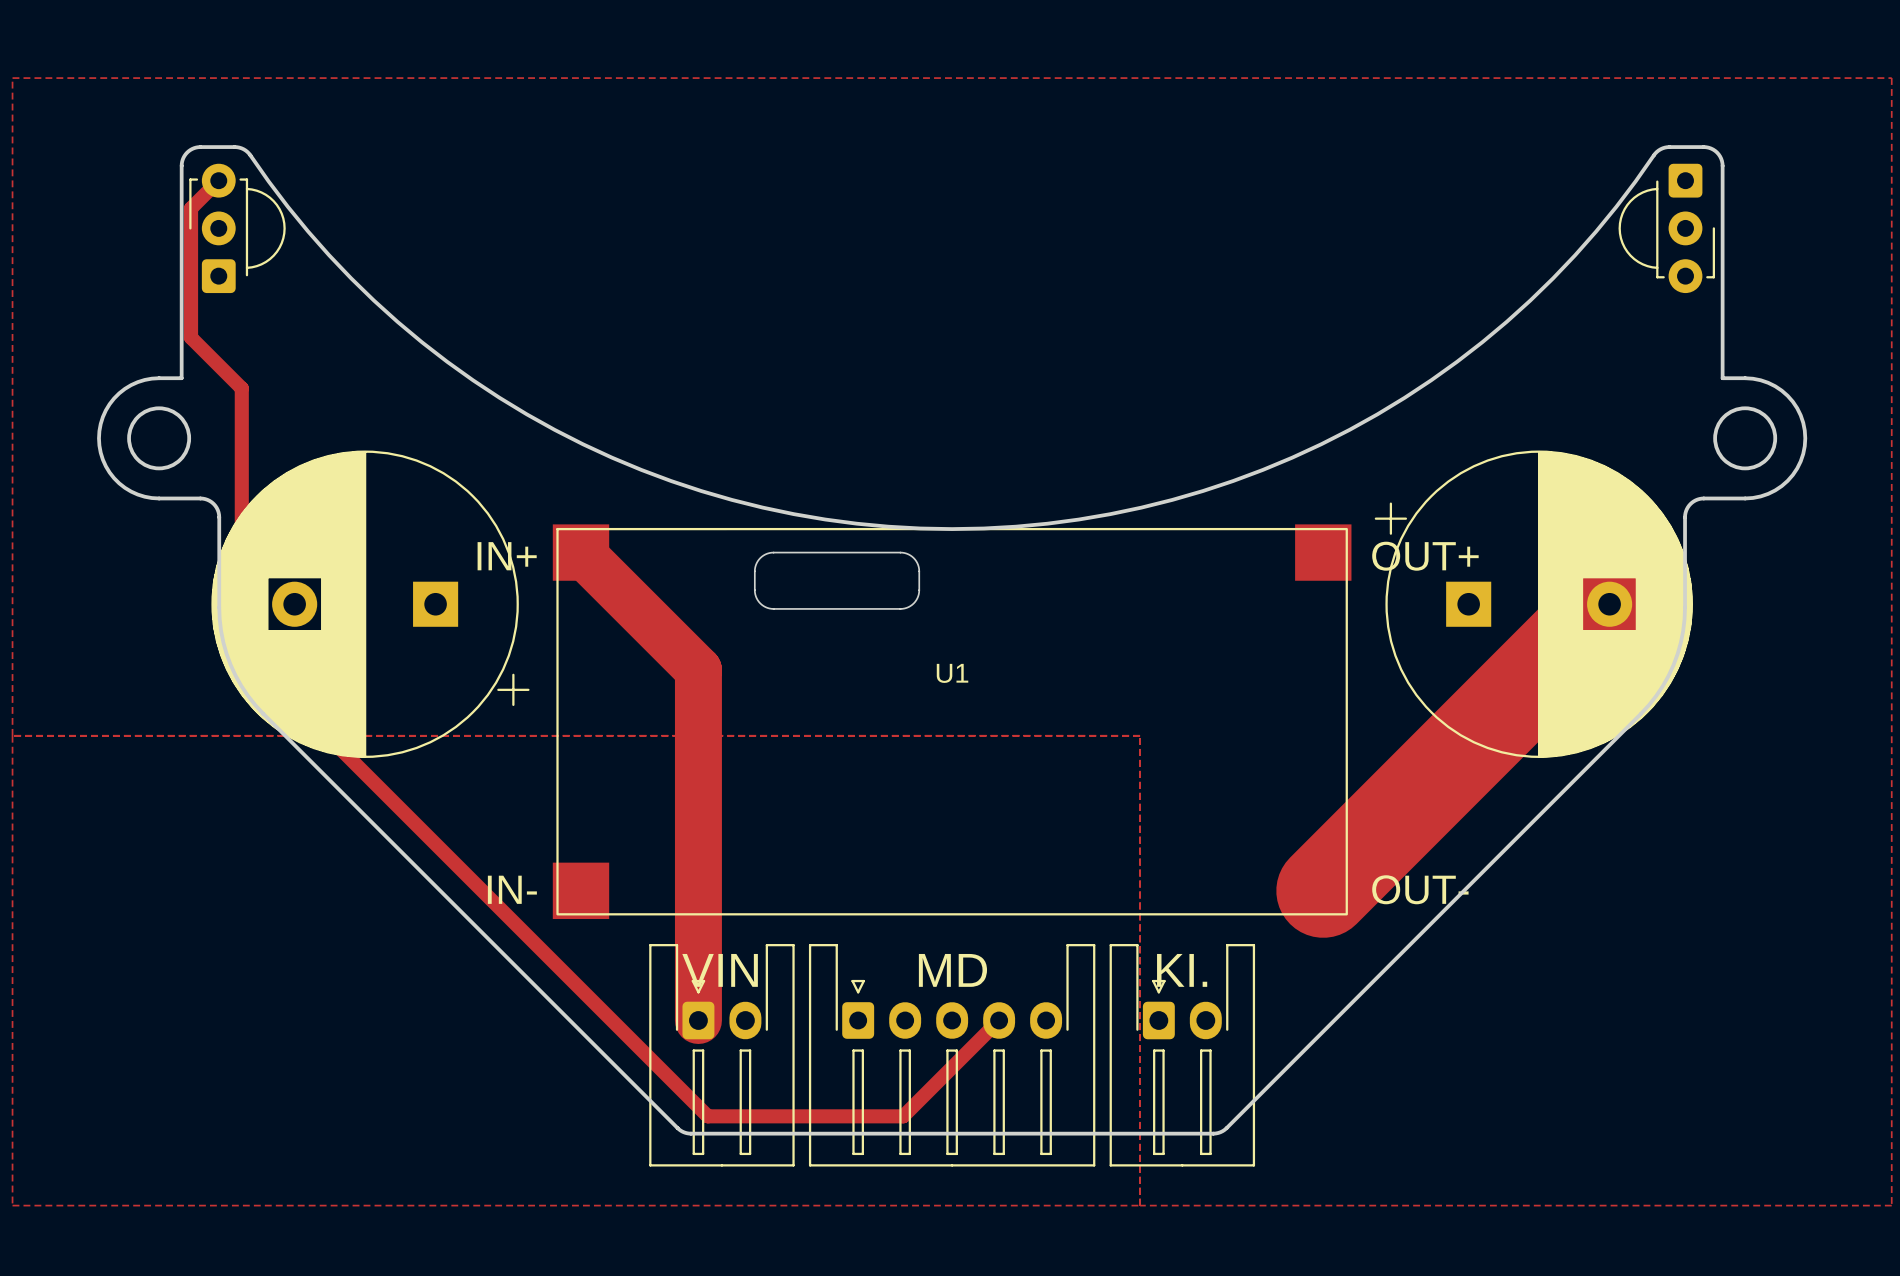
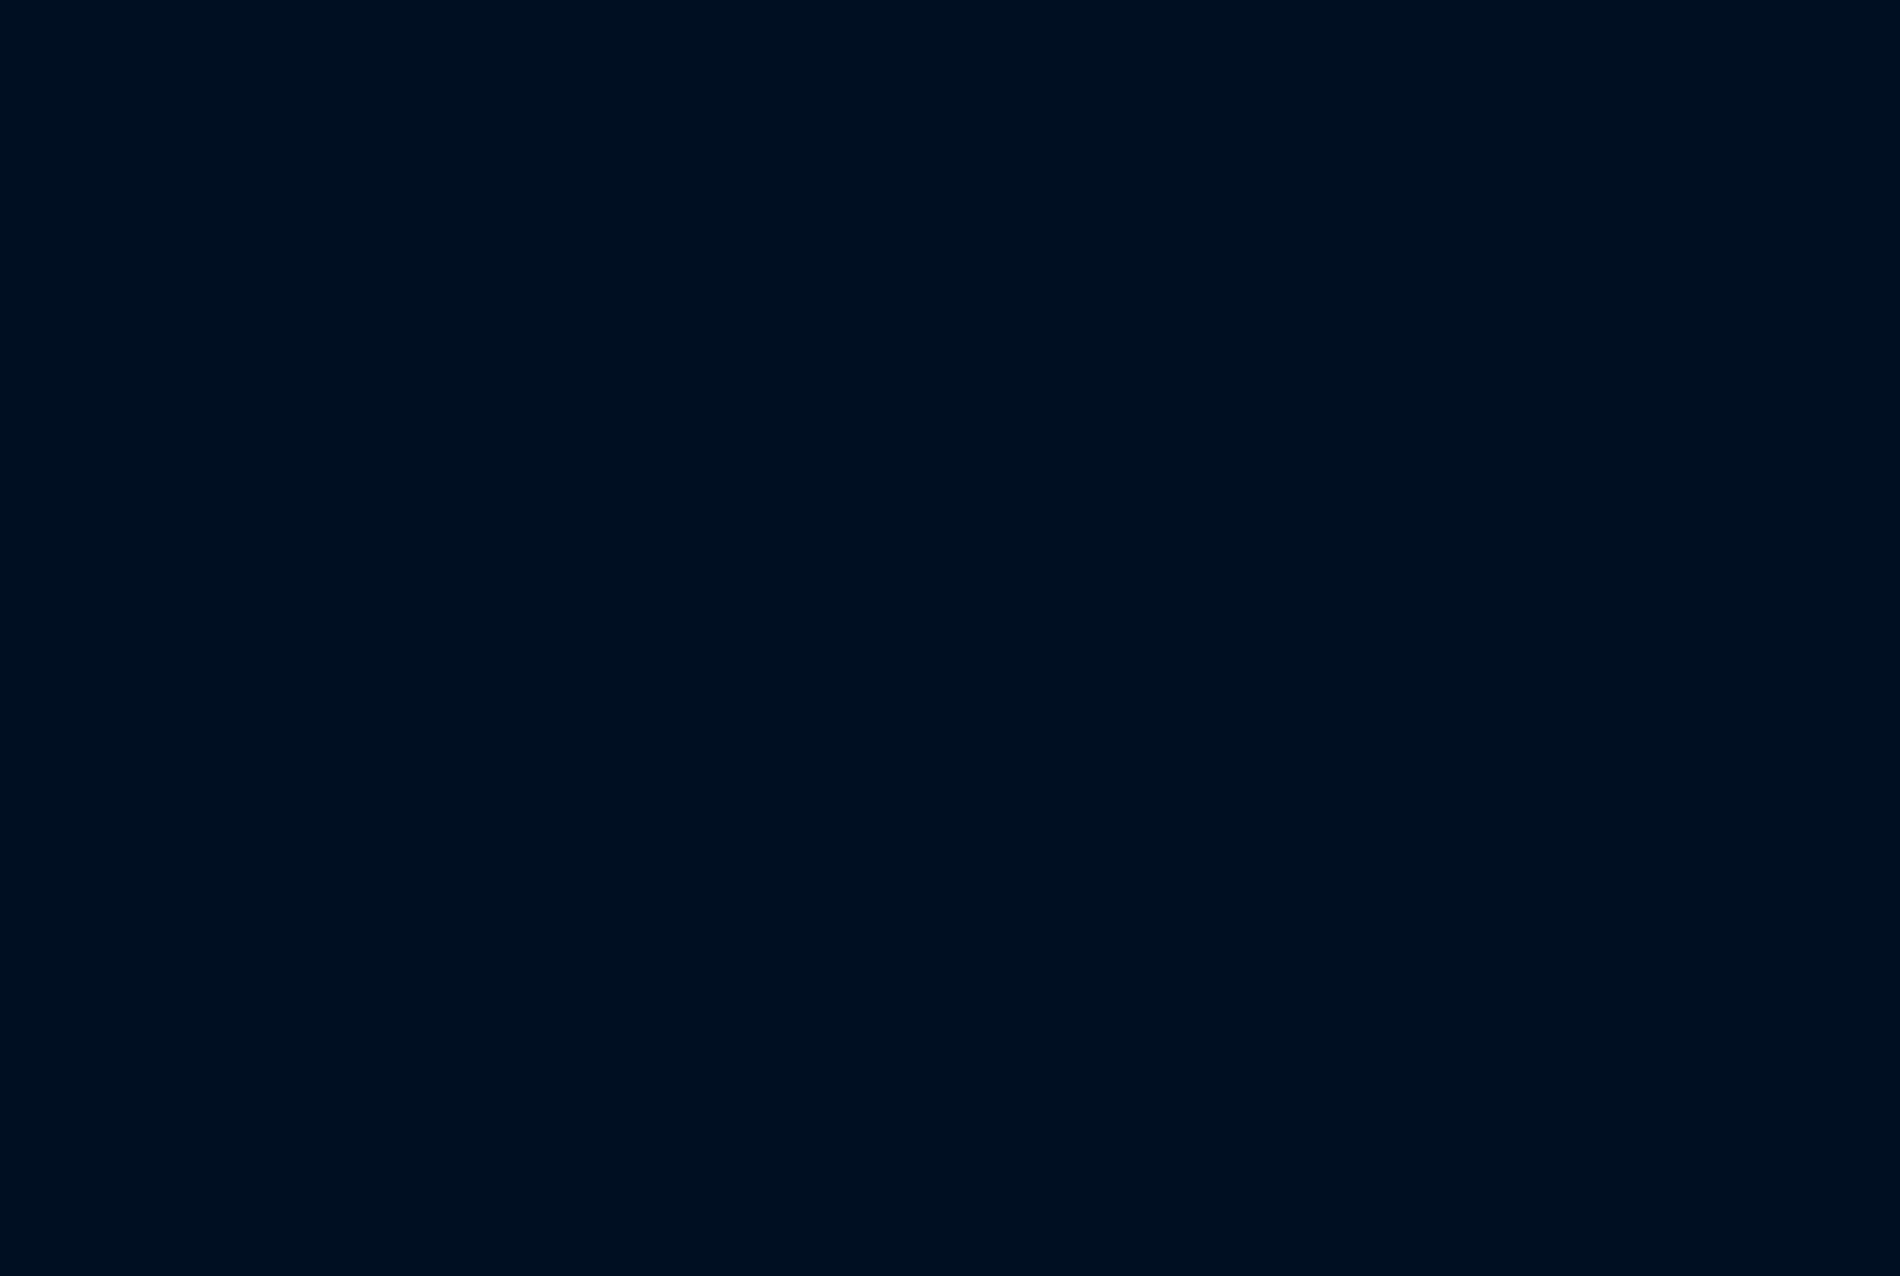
zone outline: (12, 78) (12, 1205) (1891, 1205) (1891, 78) (12, 78) -> none
board edge: (200, 147) (237, 147) (245, 150) (287, 206) (329, 255) (397, 321) (447, 361) (499, 397) (583, 444) (671, 481) (762, 507) (856, 523) (952, 529) (1047, 523) (1141, 507) (1233, 481) (1321, 444) (1377, 414) (1431, 380) (1506, 321) (1575, 255) (1616, 206) (1658, 150) (1667, 147) (1706, 147) (1717, 152) (1722, 163) (1722, 378) (1760, 380) (1781, 390) (1792, 401) (1800, 415) (1804, 430) (1804, 446) (1797, 468) (1787, 480) (1775, 490) (1753, 497) (1699, 498) (1689, 505) (1685, 517) (1683, 630) (1673, 665) (1656, 695) (1640, 713) (1222, 1131) (1213, 1133) (687, 1133) (677, 1128) (263, 713) (247, 695) (230, 665) (221, 630) (219, 517) (215, 505) (202, 498) (151, 498) (137, 494) (119, 483) (105, 466) (100, 452) (99, 431) (105, 410) (114, 398) (131, 385) (144, 379) (181, 378) (181, 163) (188, 151) (200, 147) -> none
track: (218, 180) (191, 208) (191, 337) (241, 388) (241, 650) (707, 1116) (903, 1116) (999, 1020) -> none
part: (237, 228) -> none
part: (1666, 228) -> none
round board edge: [127, 406, 192, 471] -> none
round board edge: [1713, 406, 1778, 471] -> none
track: (580, 552) (698, 670) (698, 1020) -> none
part: (370, 604) -> none
part: (1533, 604) -> none
track: (1609, 604) (1323, 890) -> none
U1: (952, 721) -> none
zone outline: (12, 735) (1140, 735) (1140, 1205) -> none
VIN: (721, 1055) -> none
MD: (952, 1055) -> none
KI.: (1182, 1055) -> none

